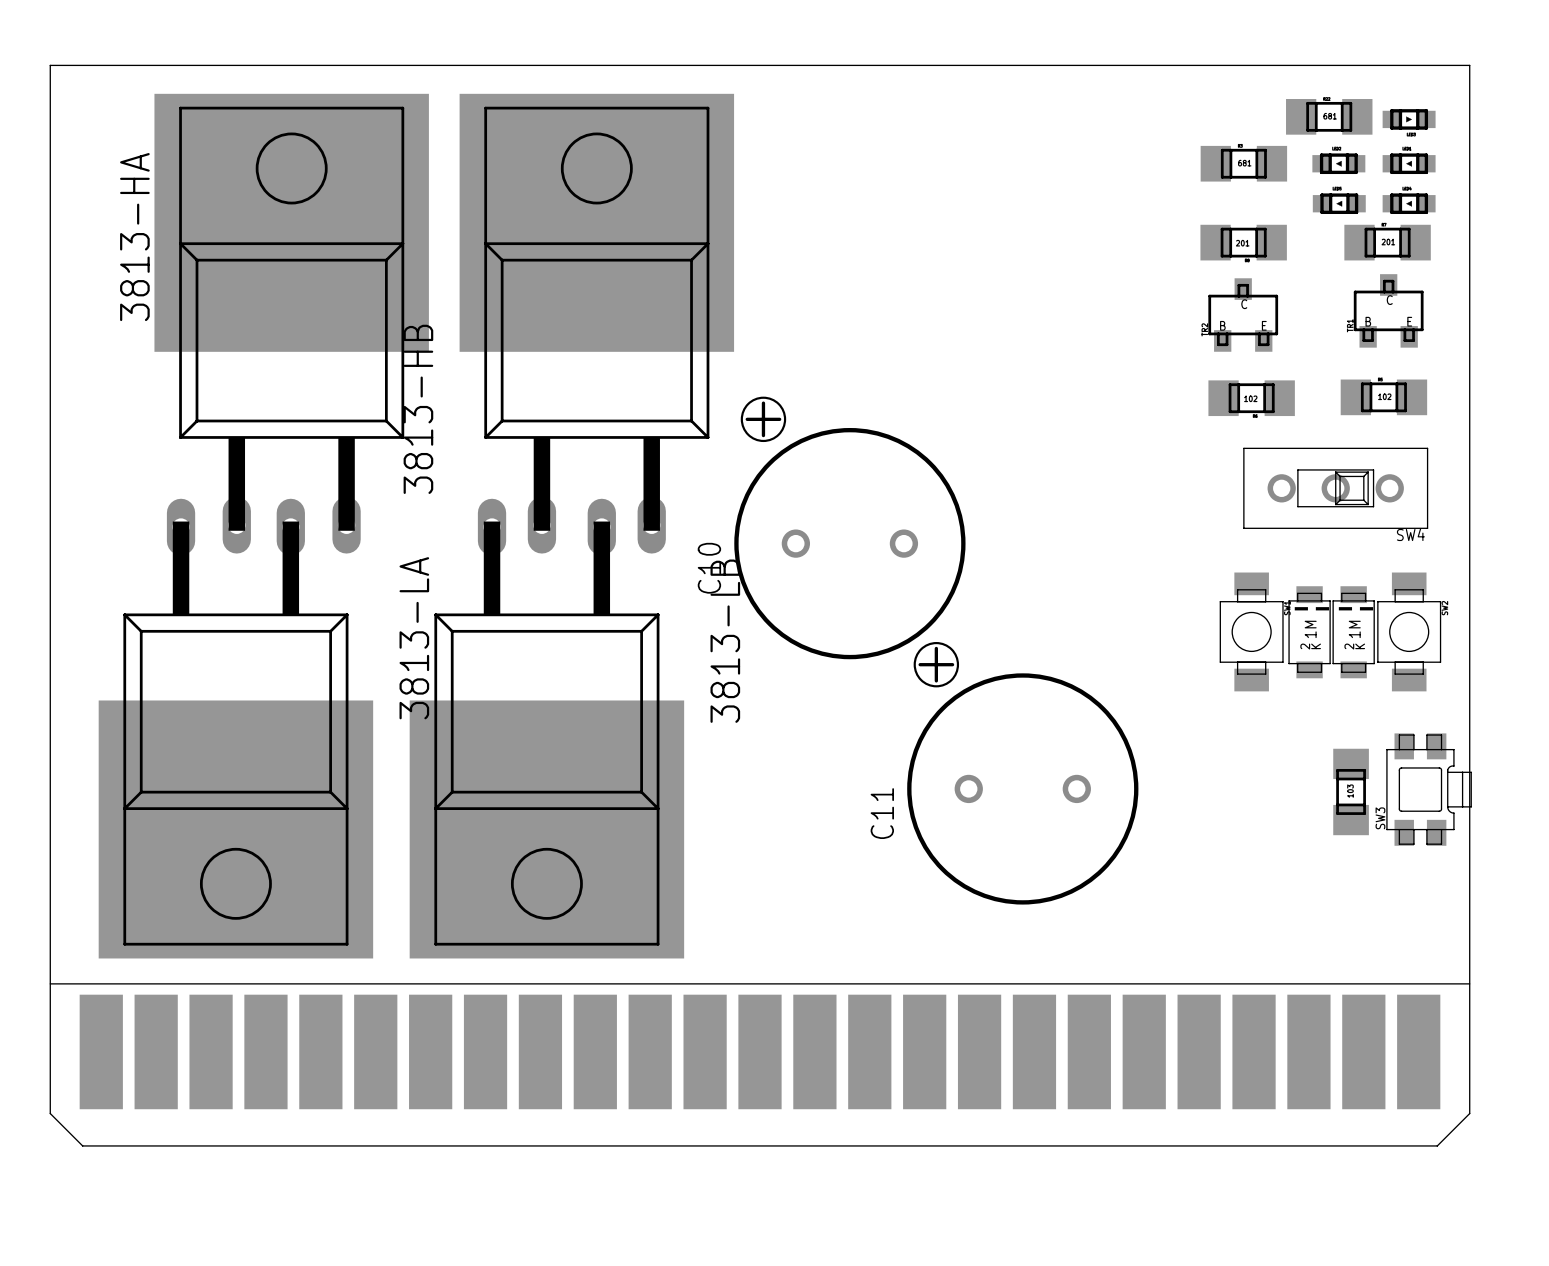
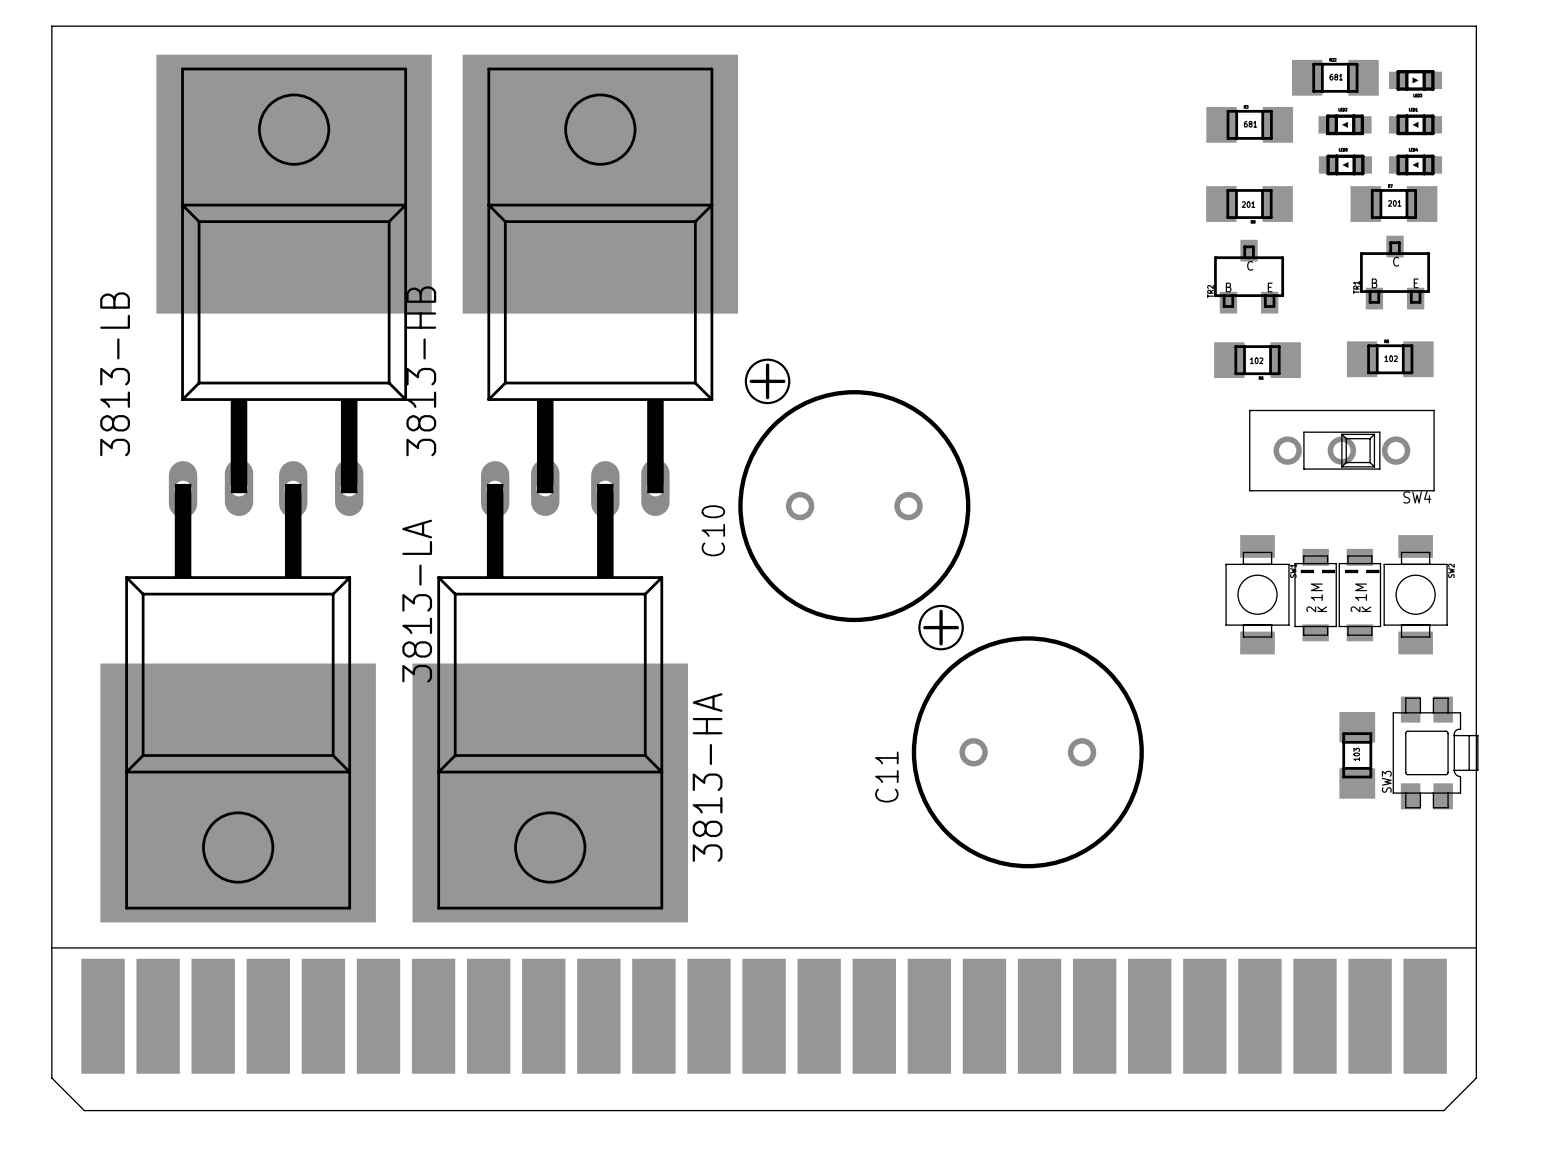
3813-HA name: 3813-HA (134, 237) -> 3813-LB (115, 374)
3813-LB name: 3813-LB (725, 641) -> 3813-HA (707, 777)

